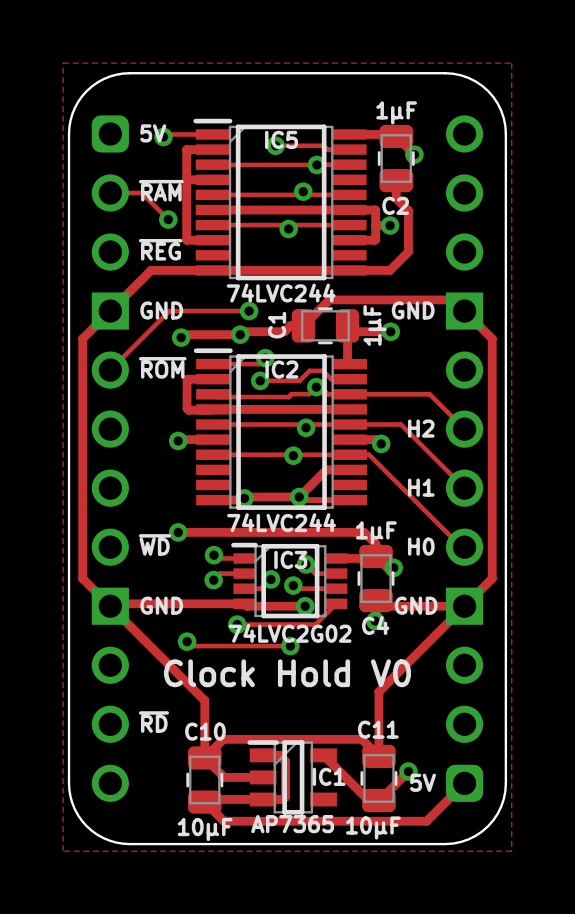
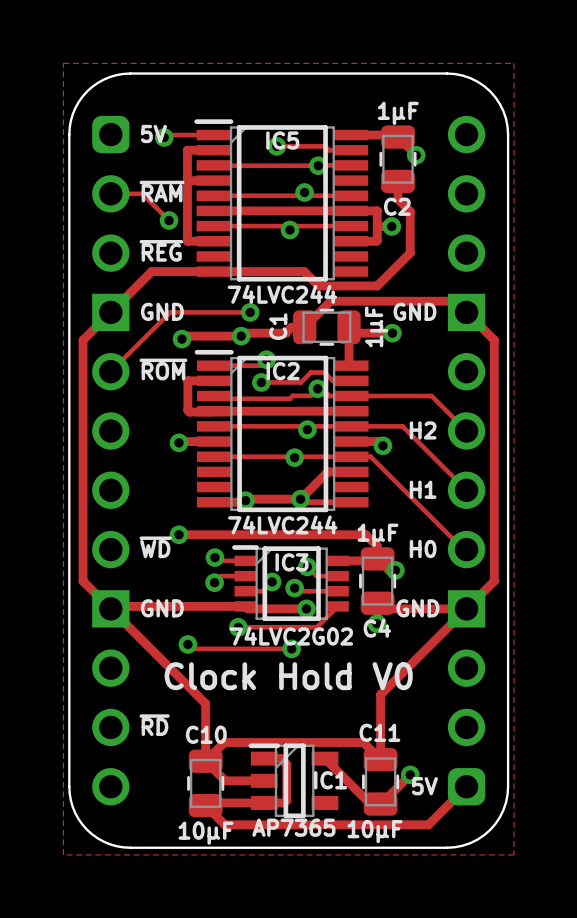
track: (302, 270) (389, 270) -> (304, 271) (318, 285) (377, 285) (391, 271)

